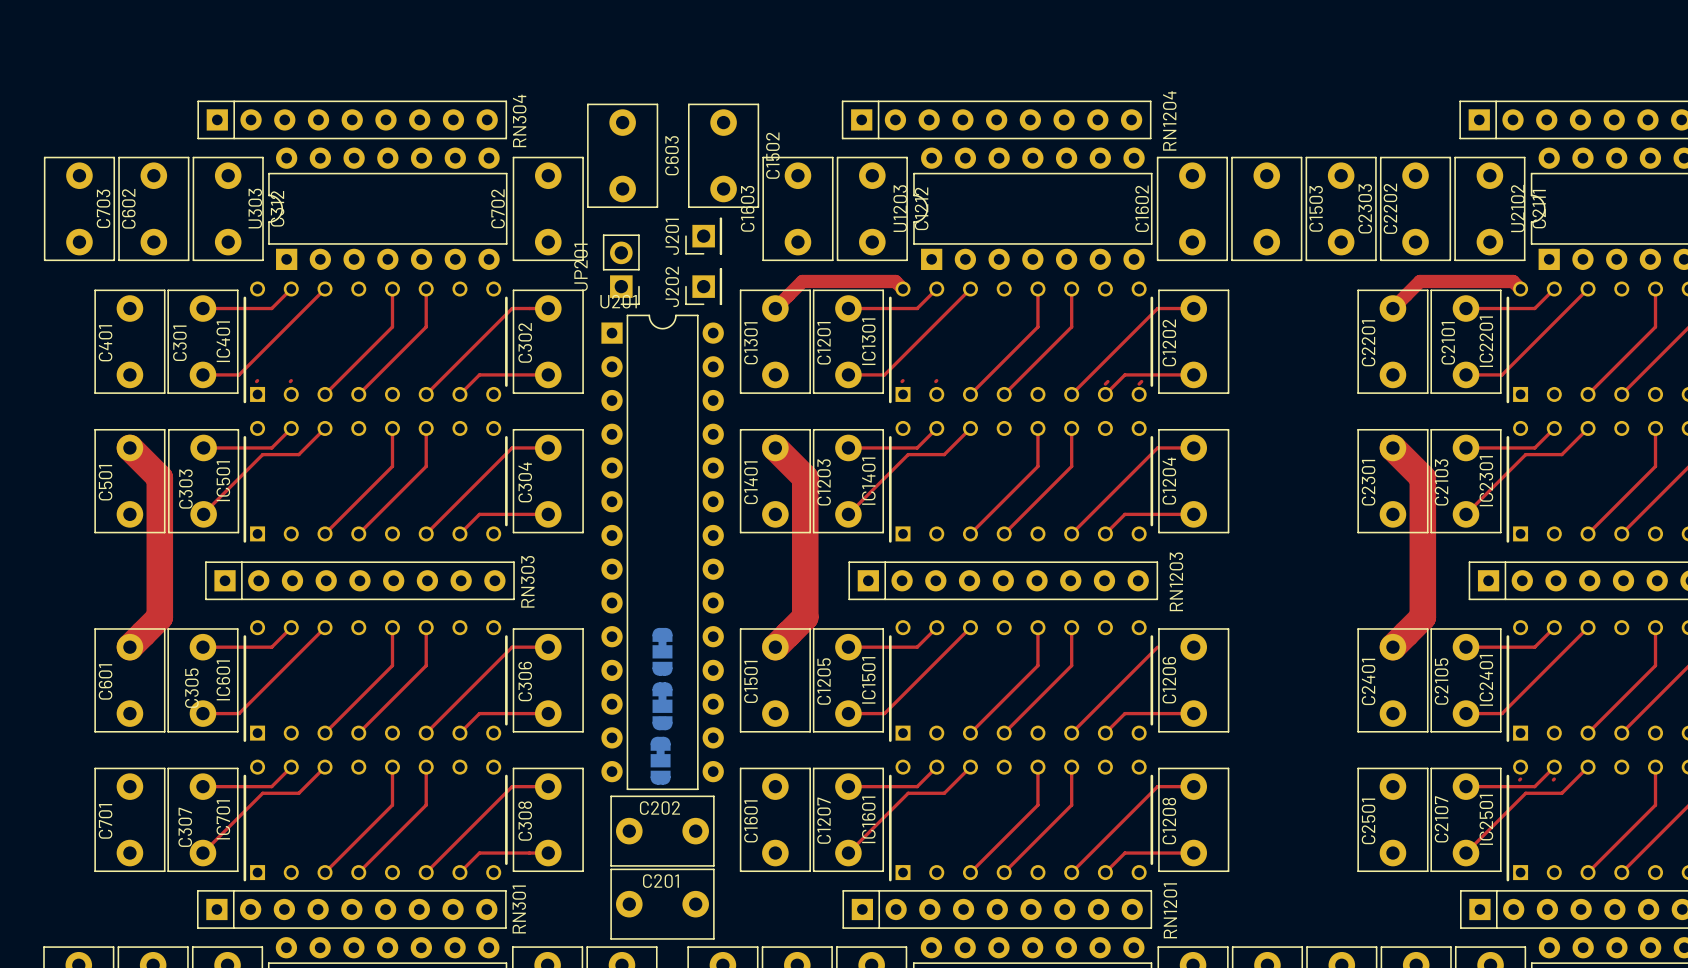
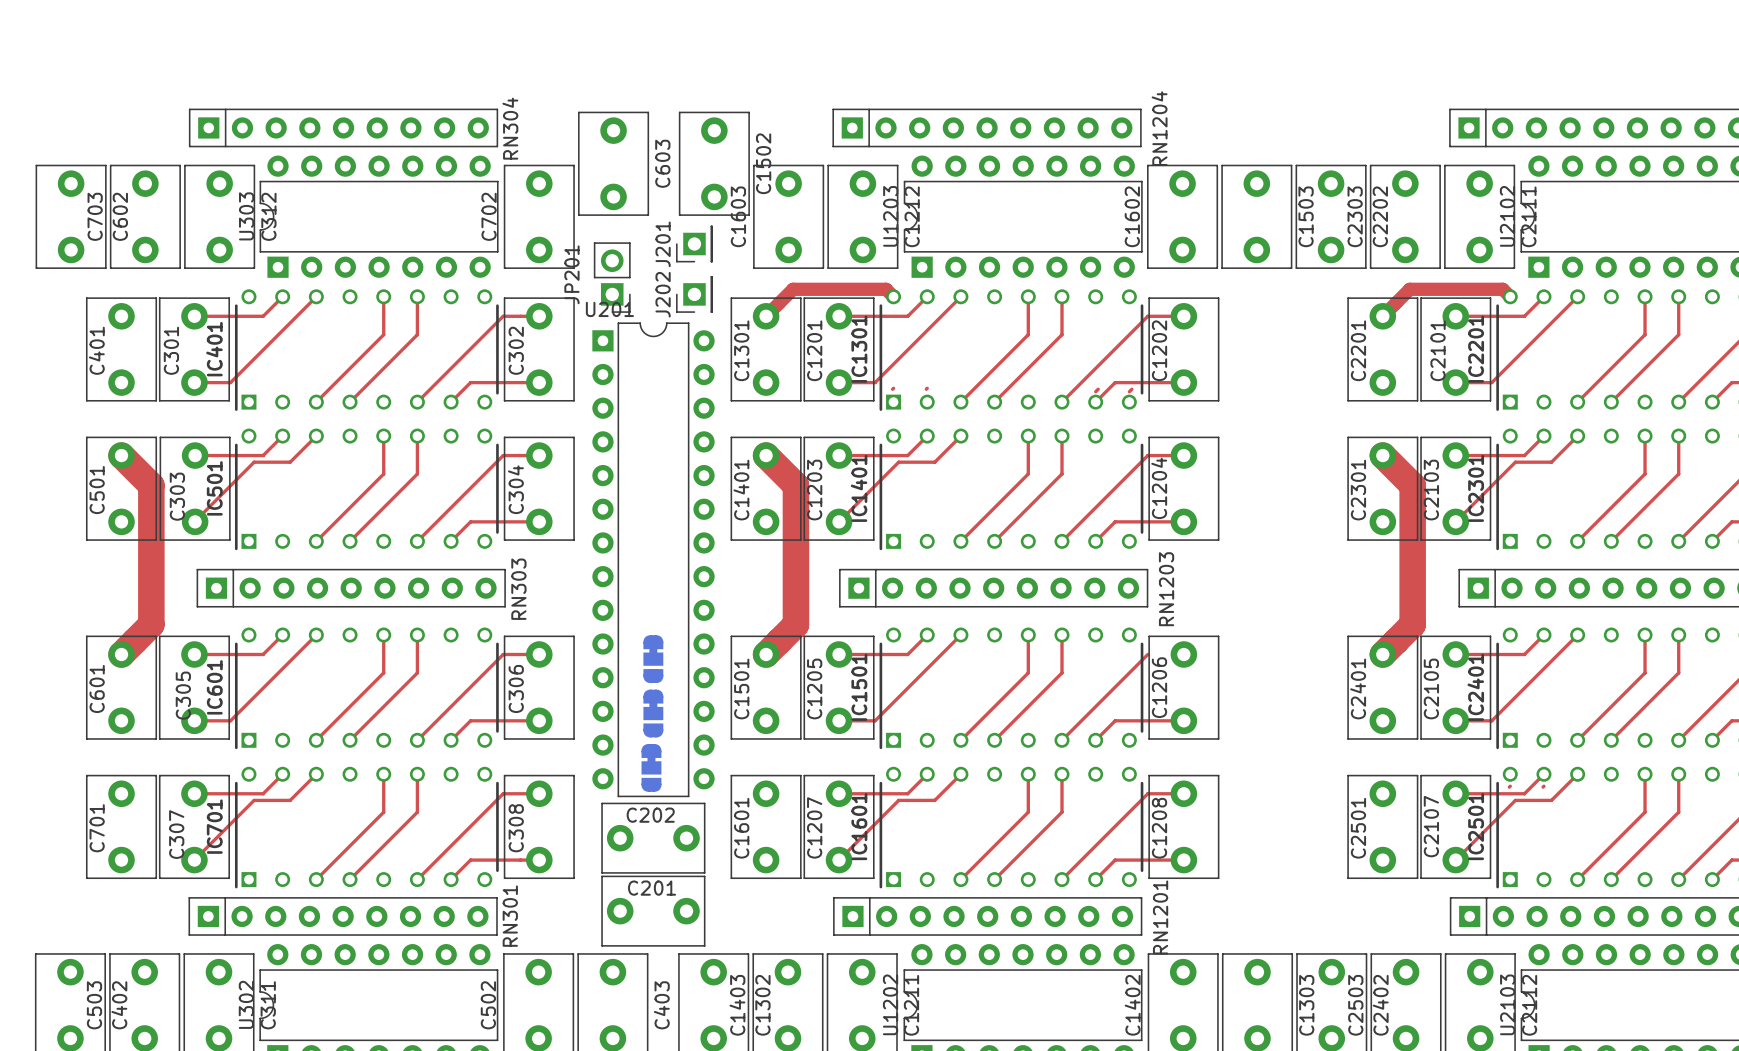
top track: (257, 380) (256, 381) -> none
top track: (291, 380) (290, 381) -> none

